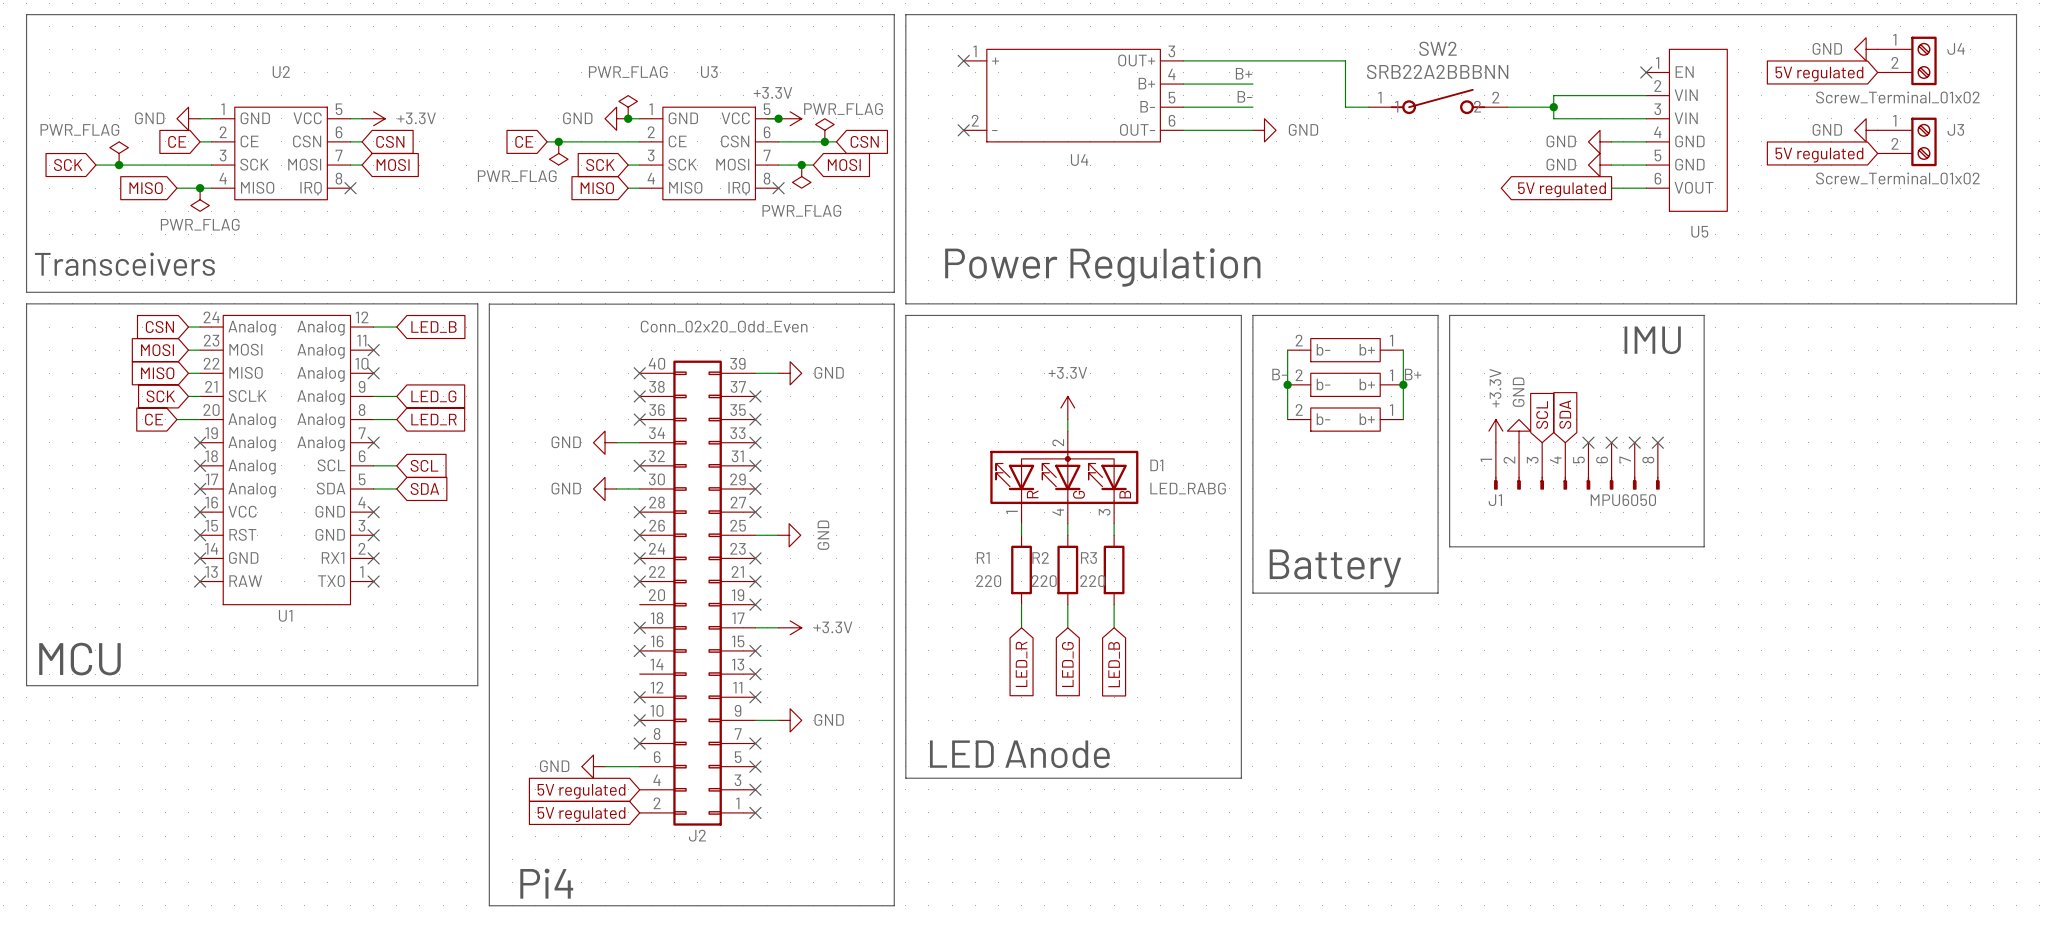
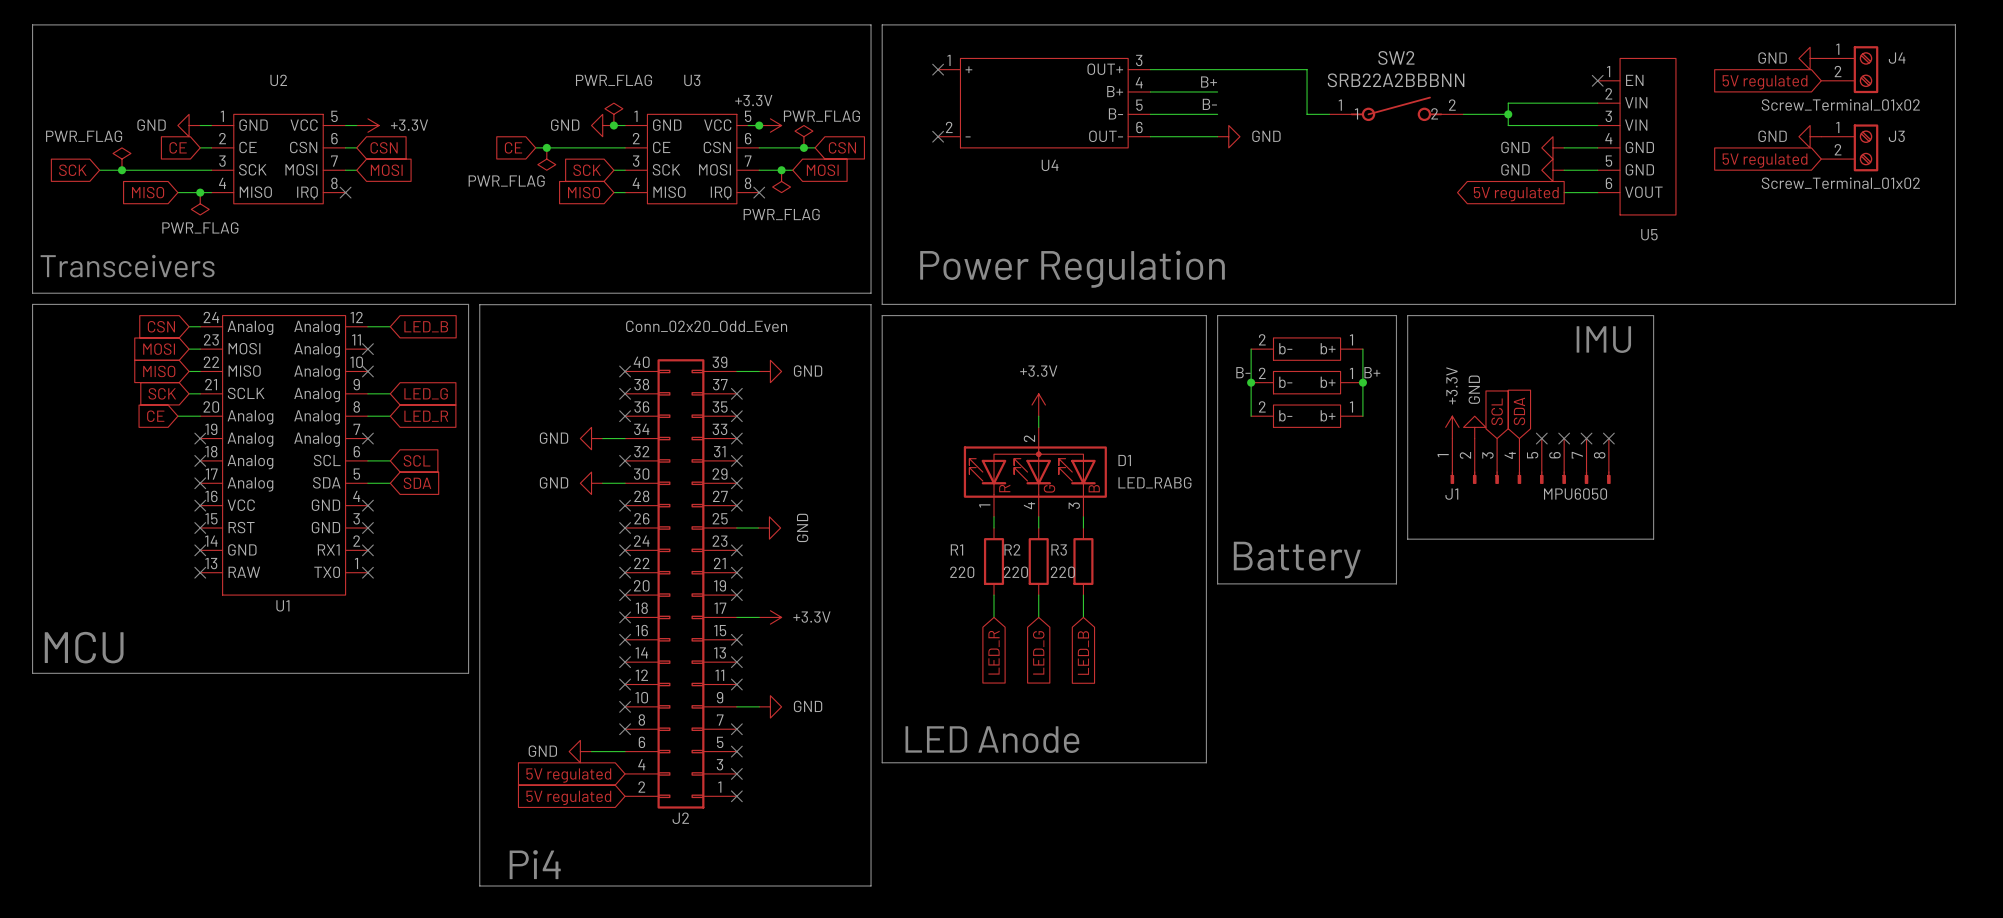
no-connect mark: none -> (625, 595)
no-connect mark: none -> (625, 662)

